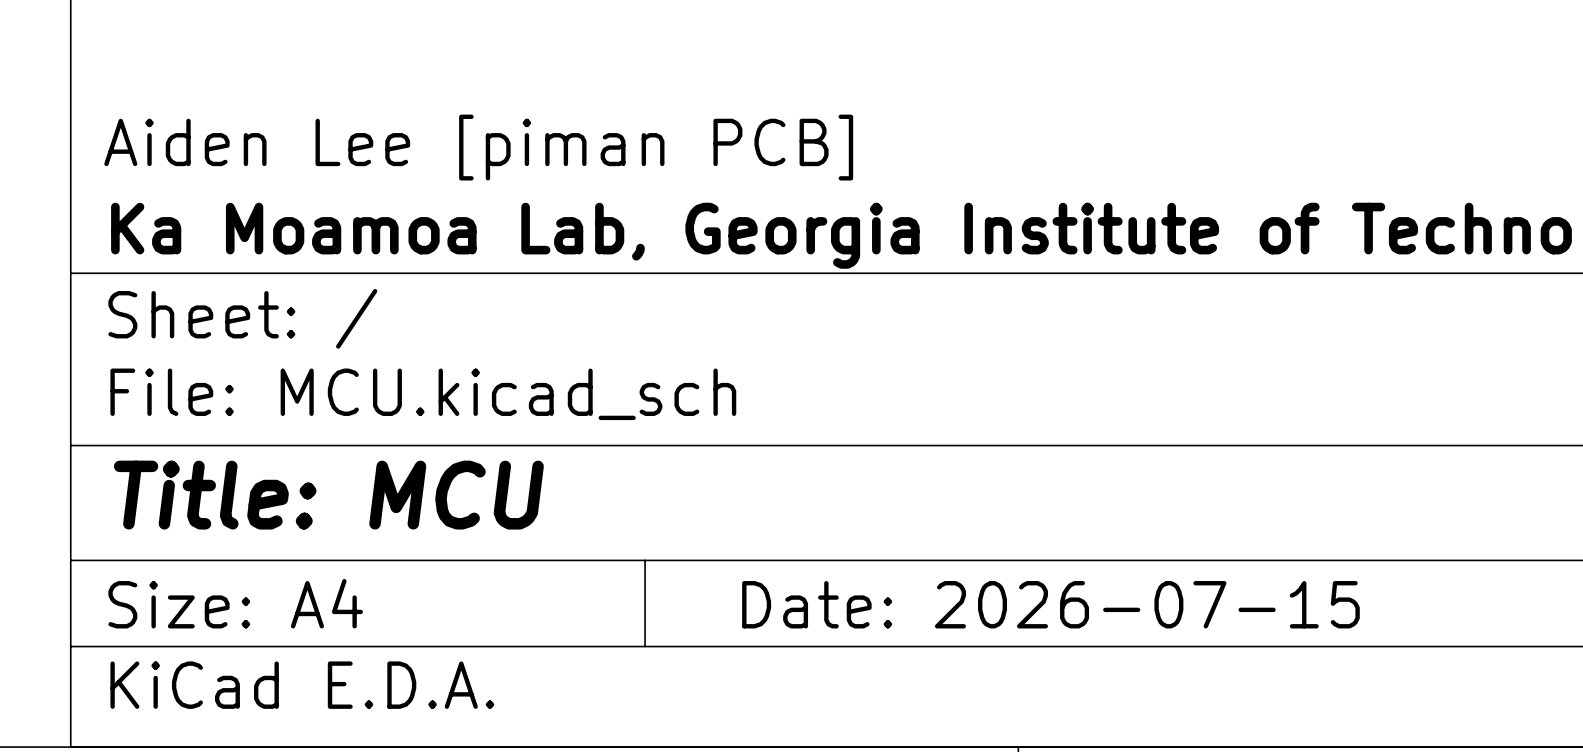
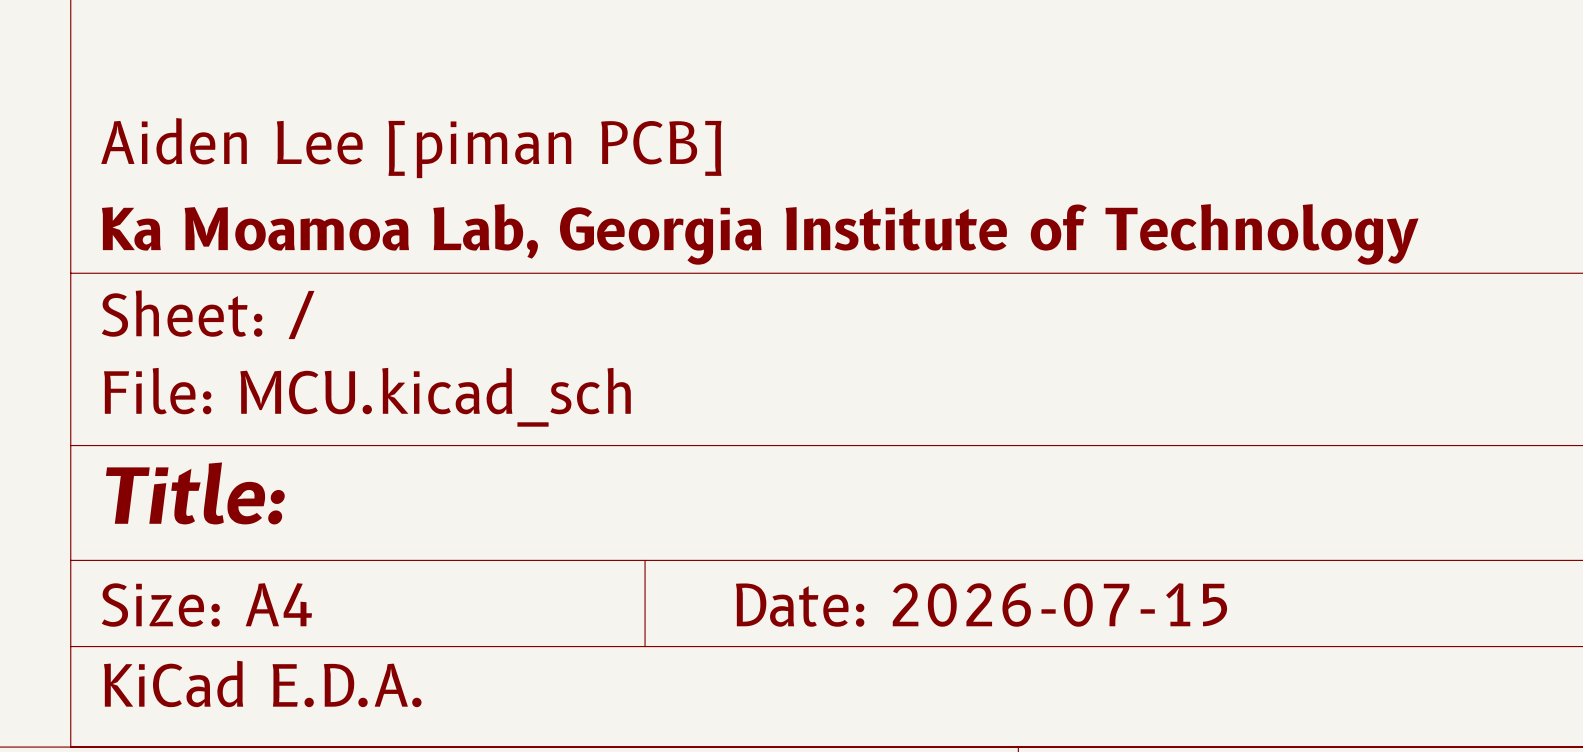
title block: Title: MCU (328, 495) -> Title: (195, 493)

